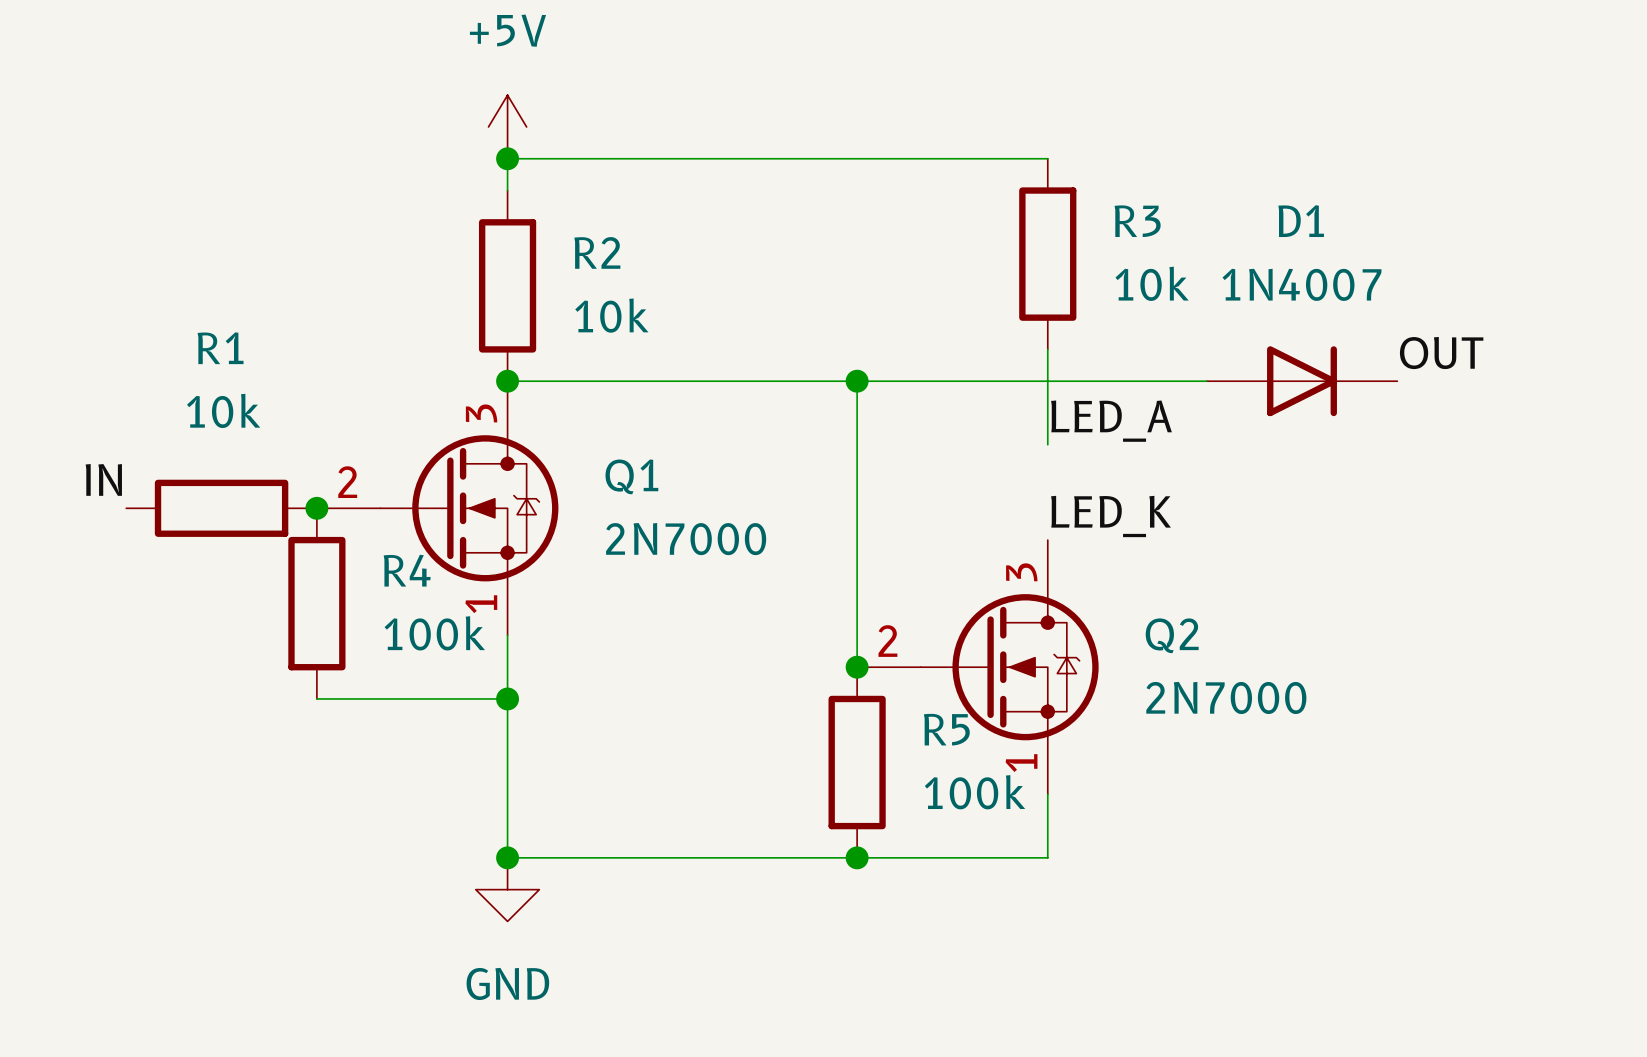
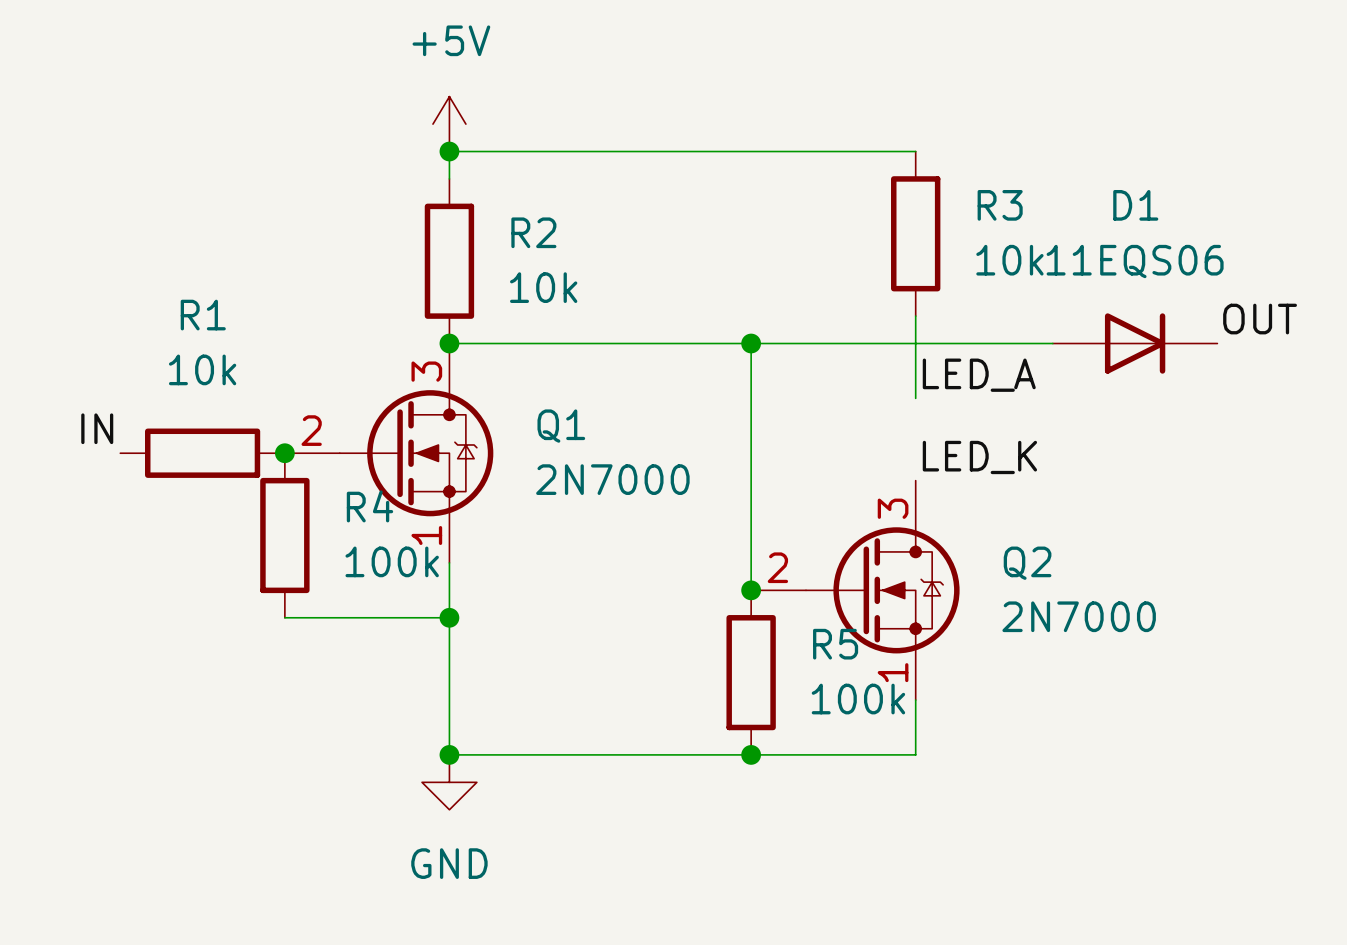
D1 value: 1N4007 (1301, 284) -> 11EQS06 (1135, 261)

